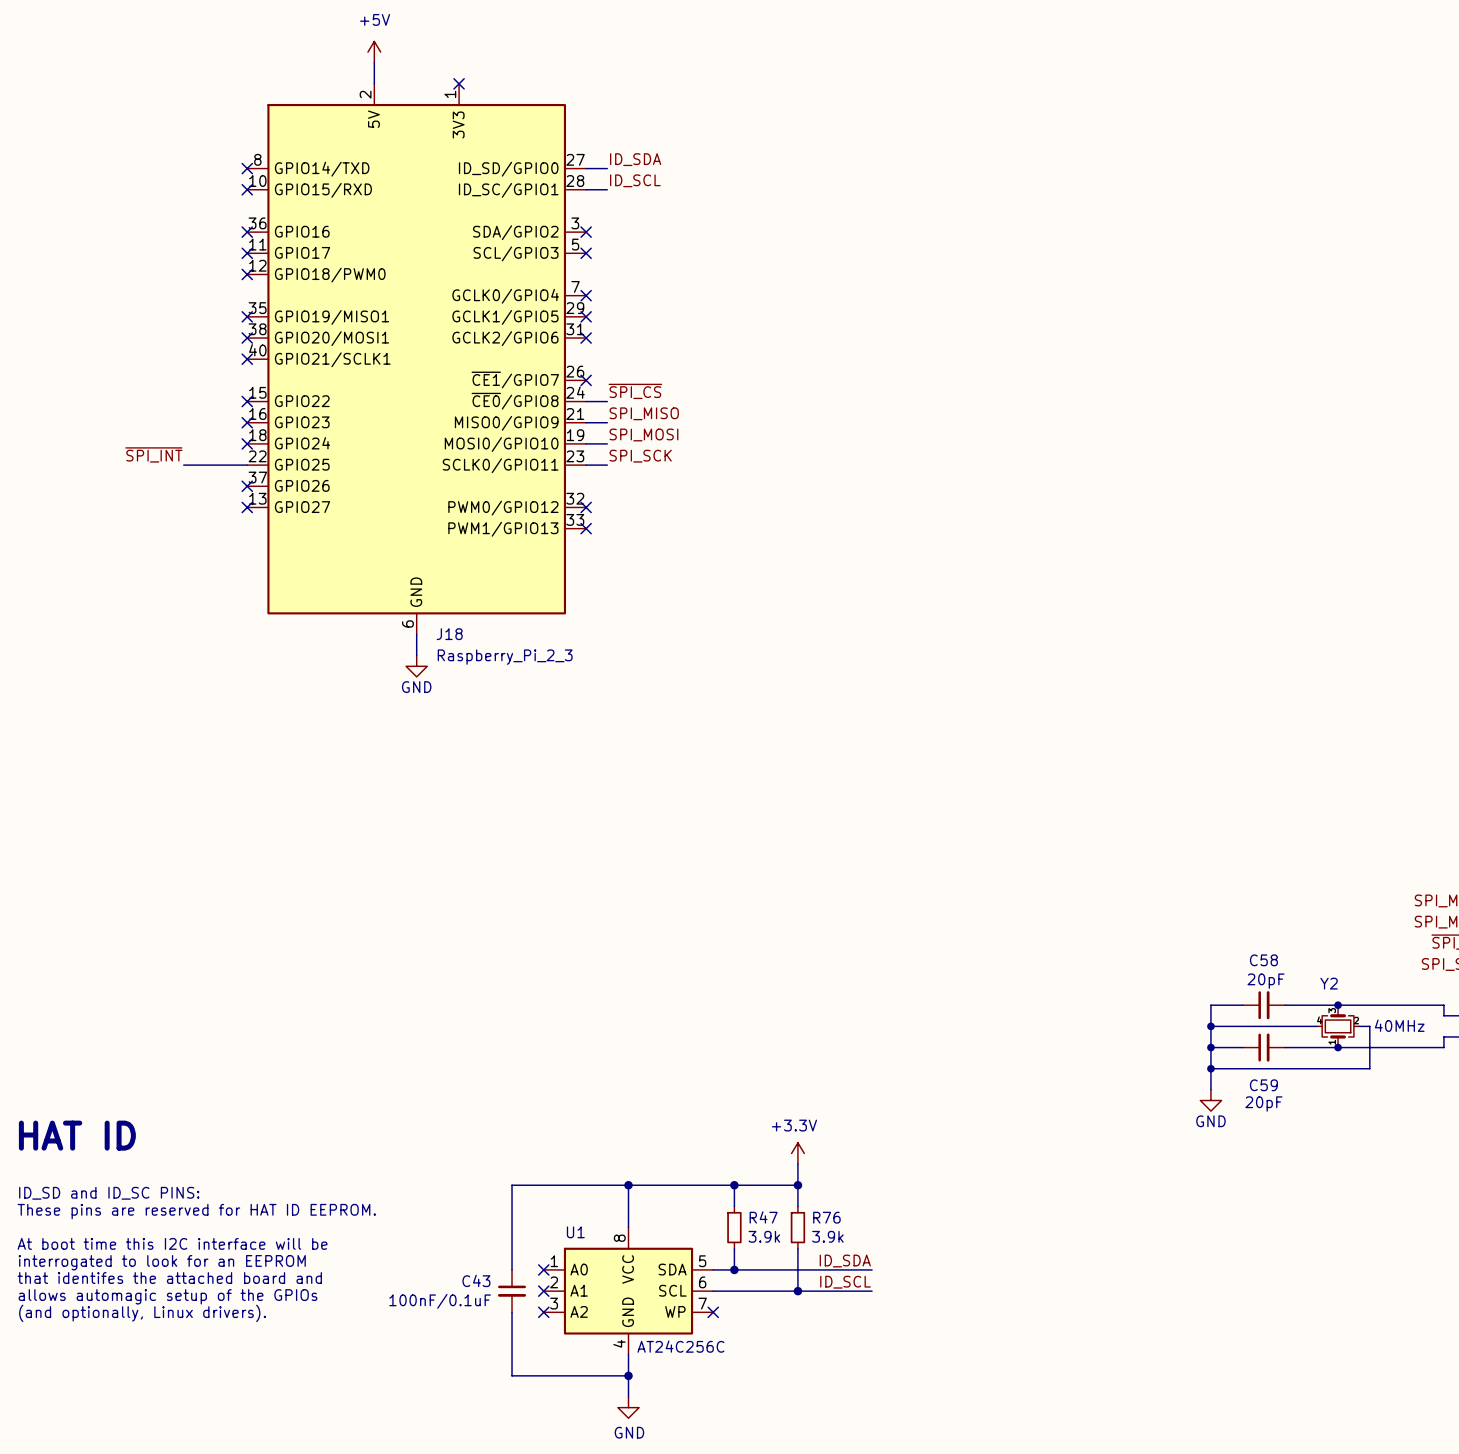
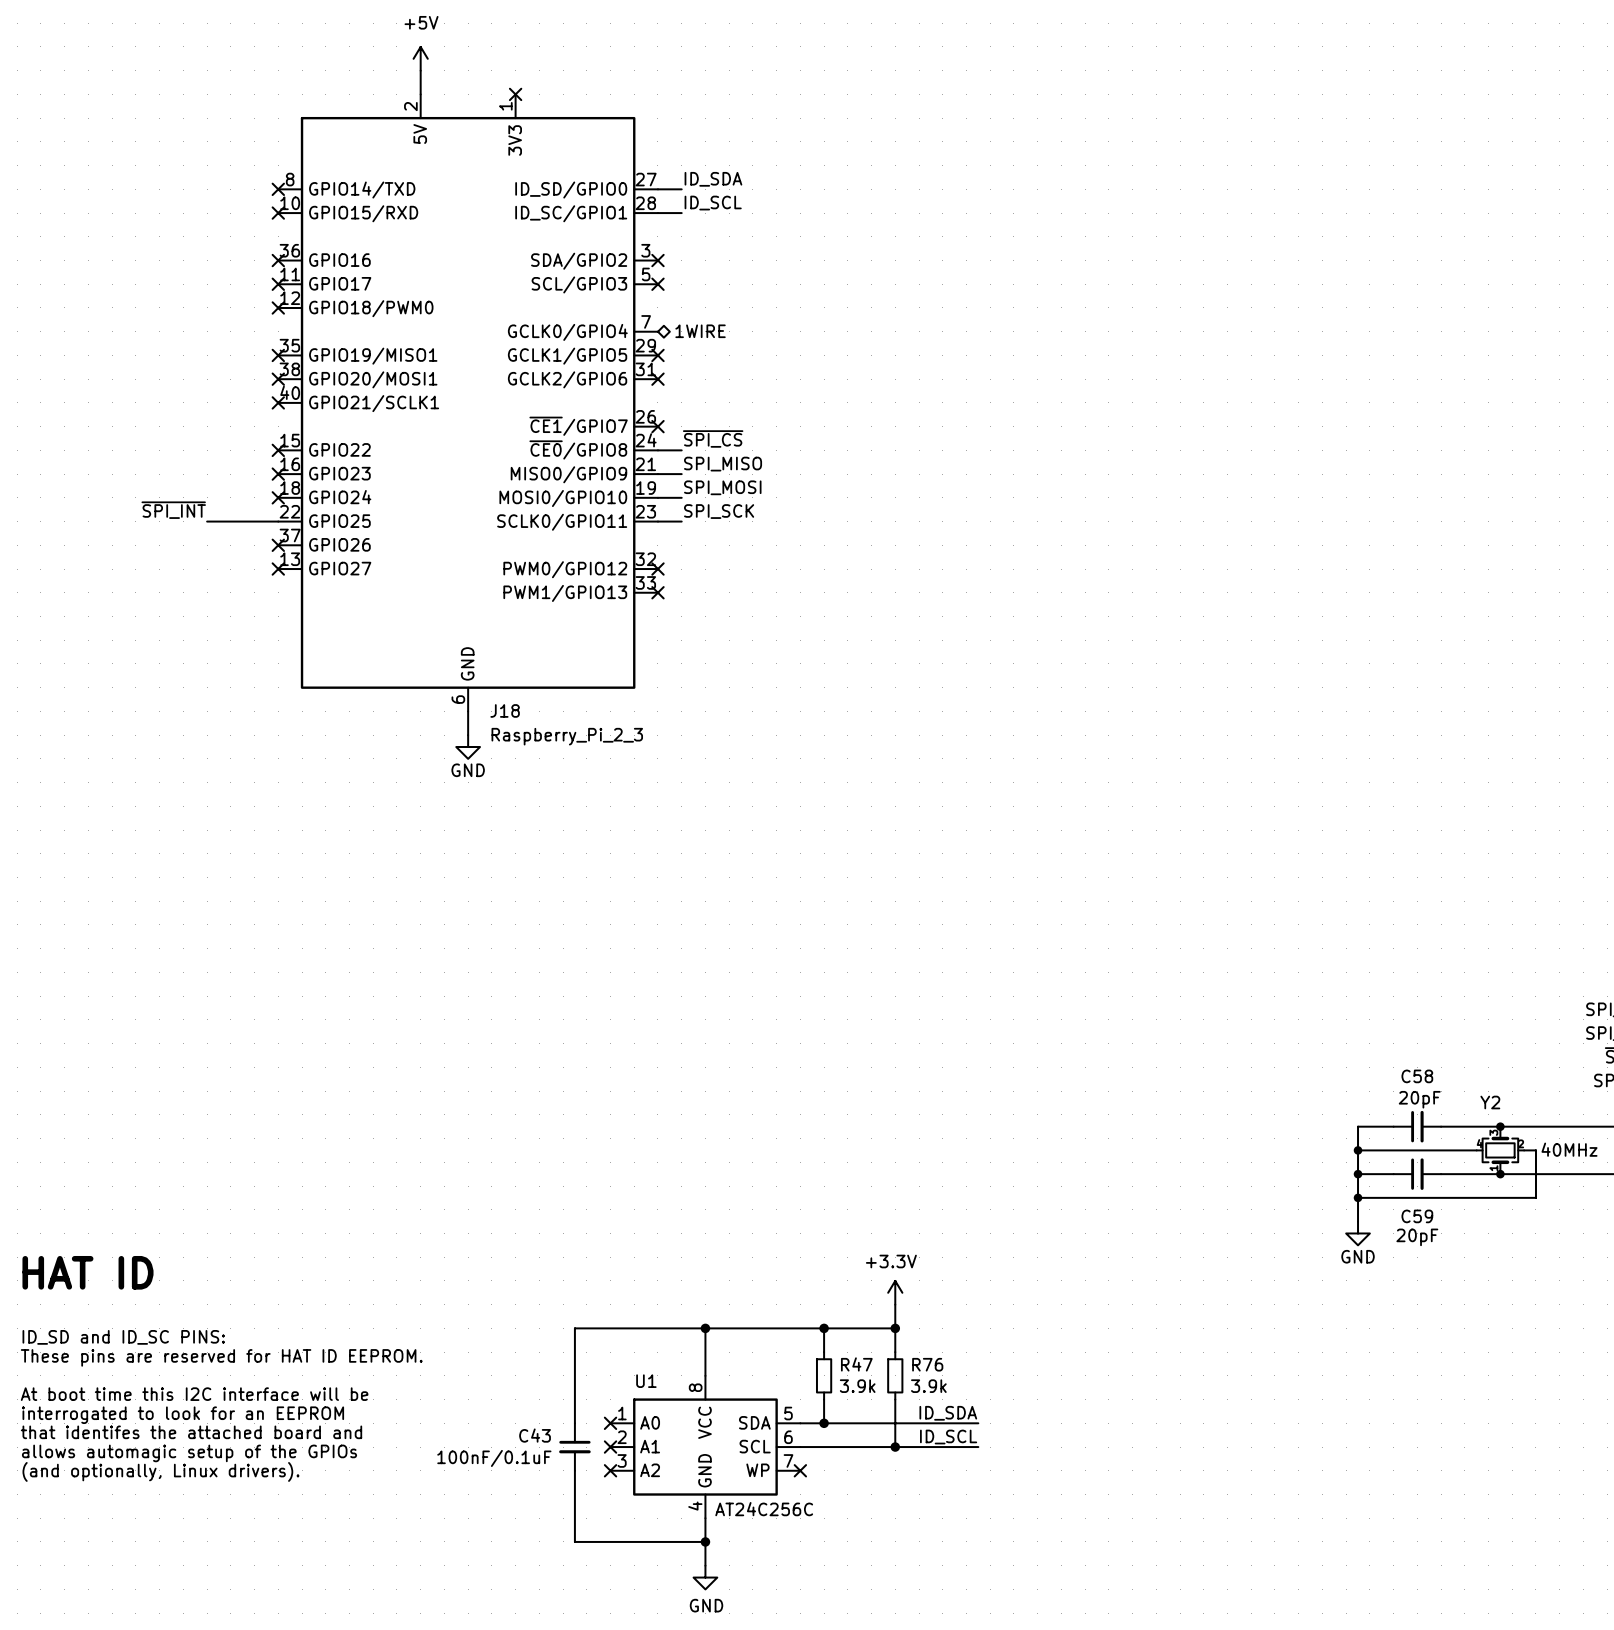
no-connect mark: (586, 295) -> none
hierarchical label: none -> 1WIRE (700, 331)

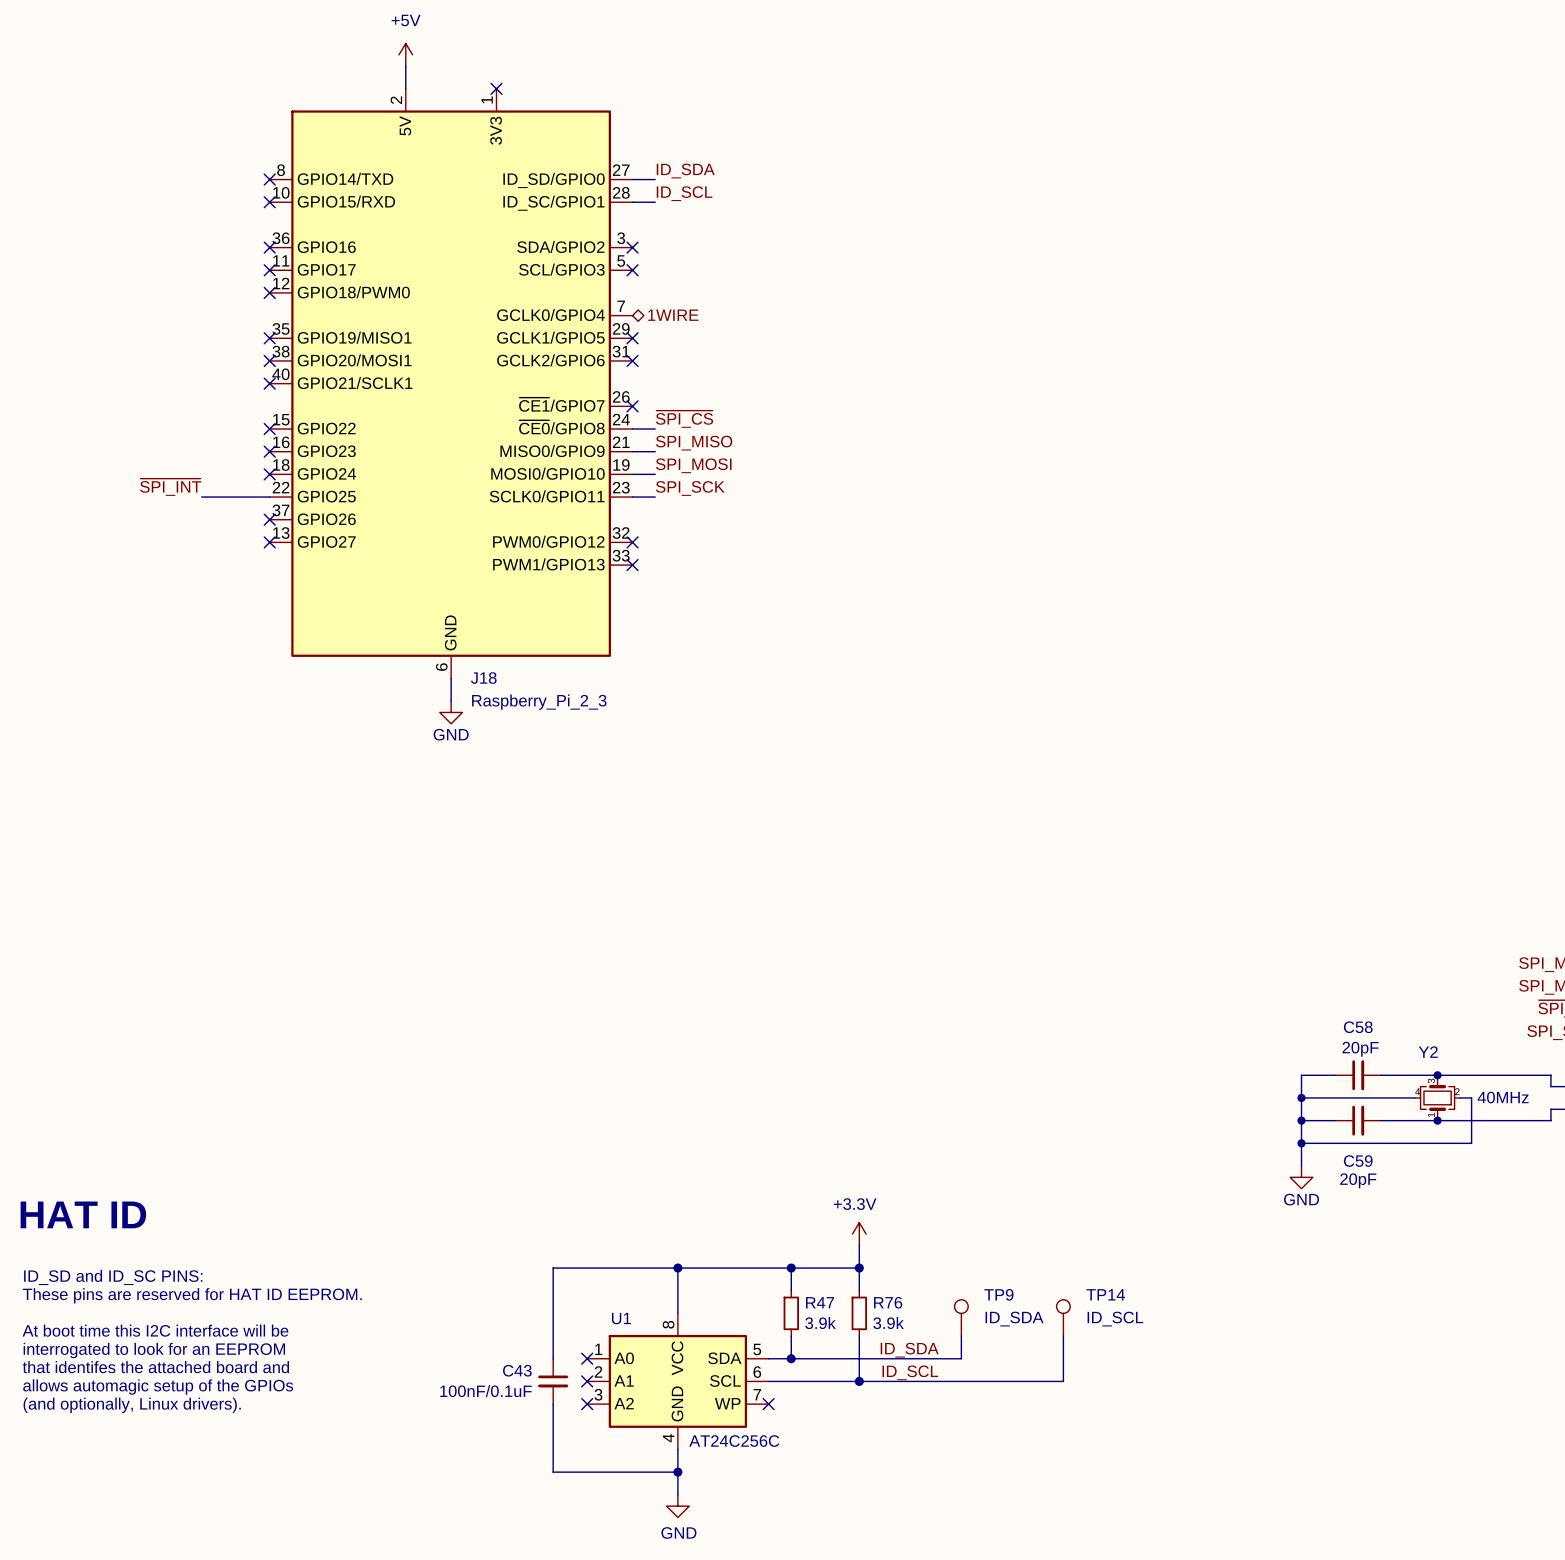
TP9: none -> ID_SDA (961, 1317)
TP14: none -> ID_SCL (1063, 1317)
wire: none -> (961, 1336) (961, 1358) (938, 1358)
wire: none -> (1063, 1336) (1063, 1381) (938, 1381)

